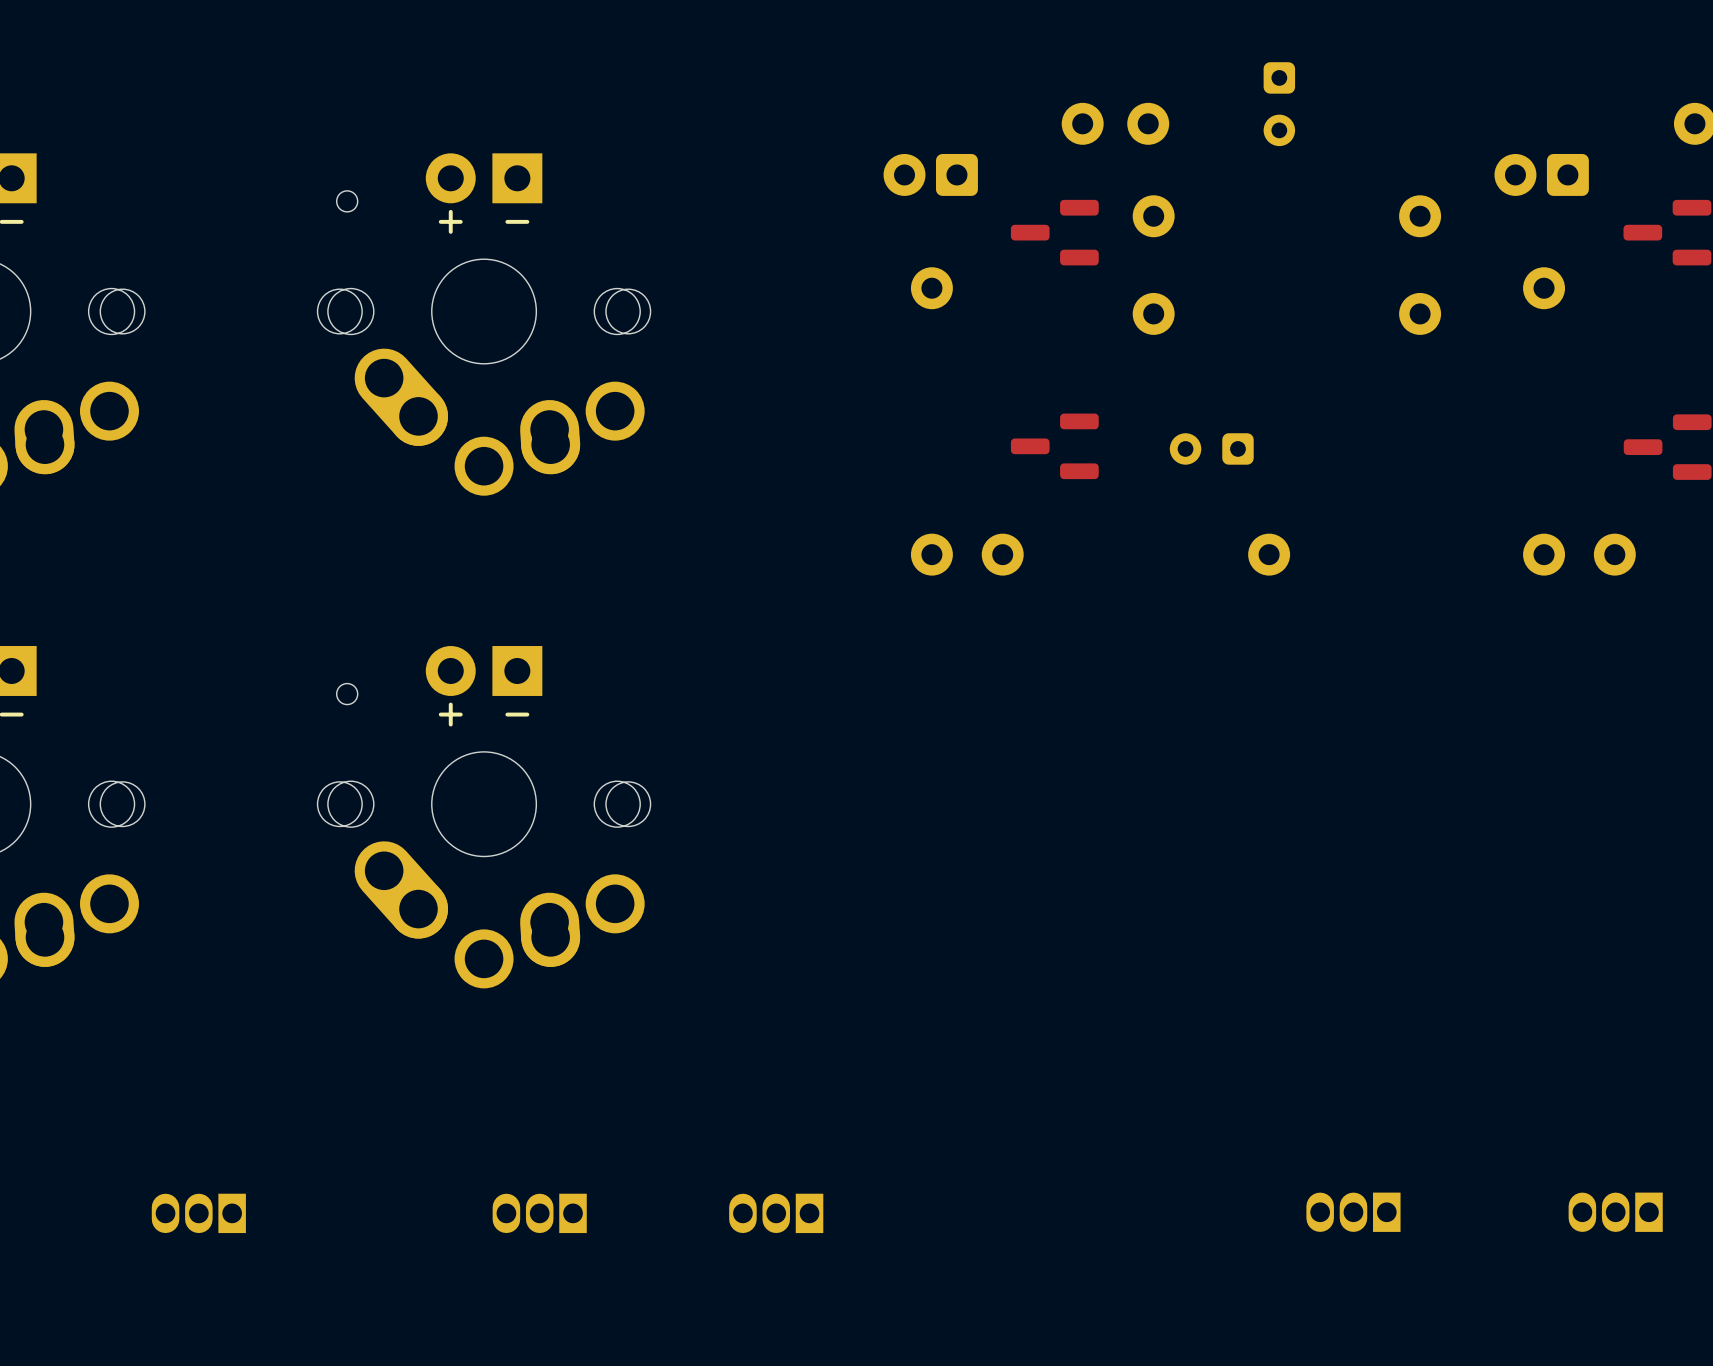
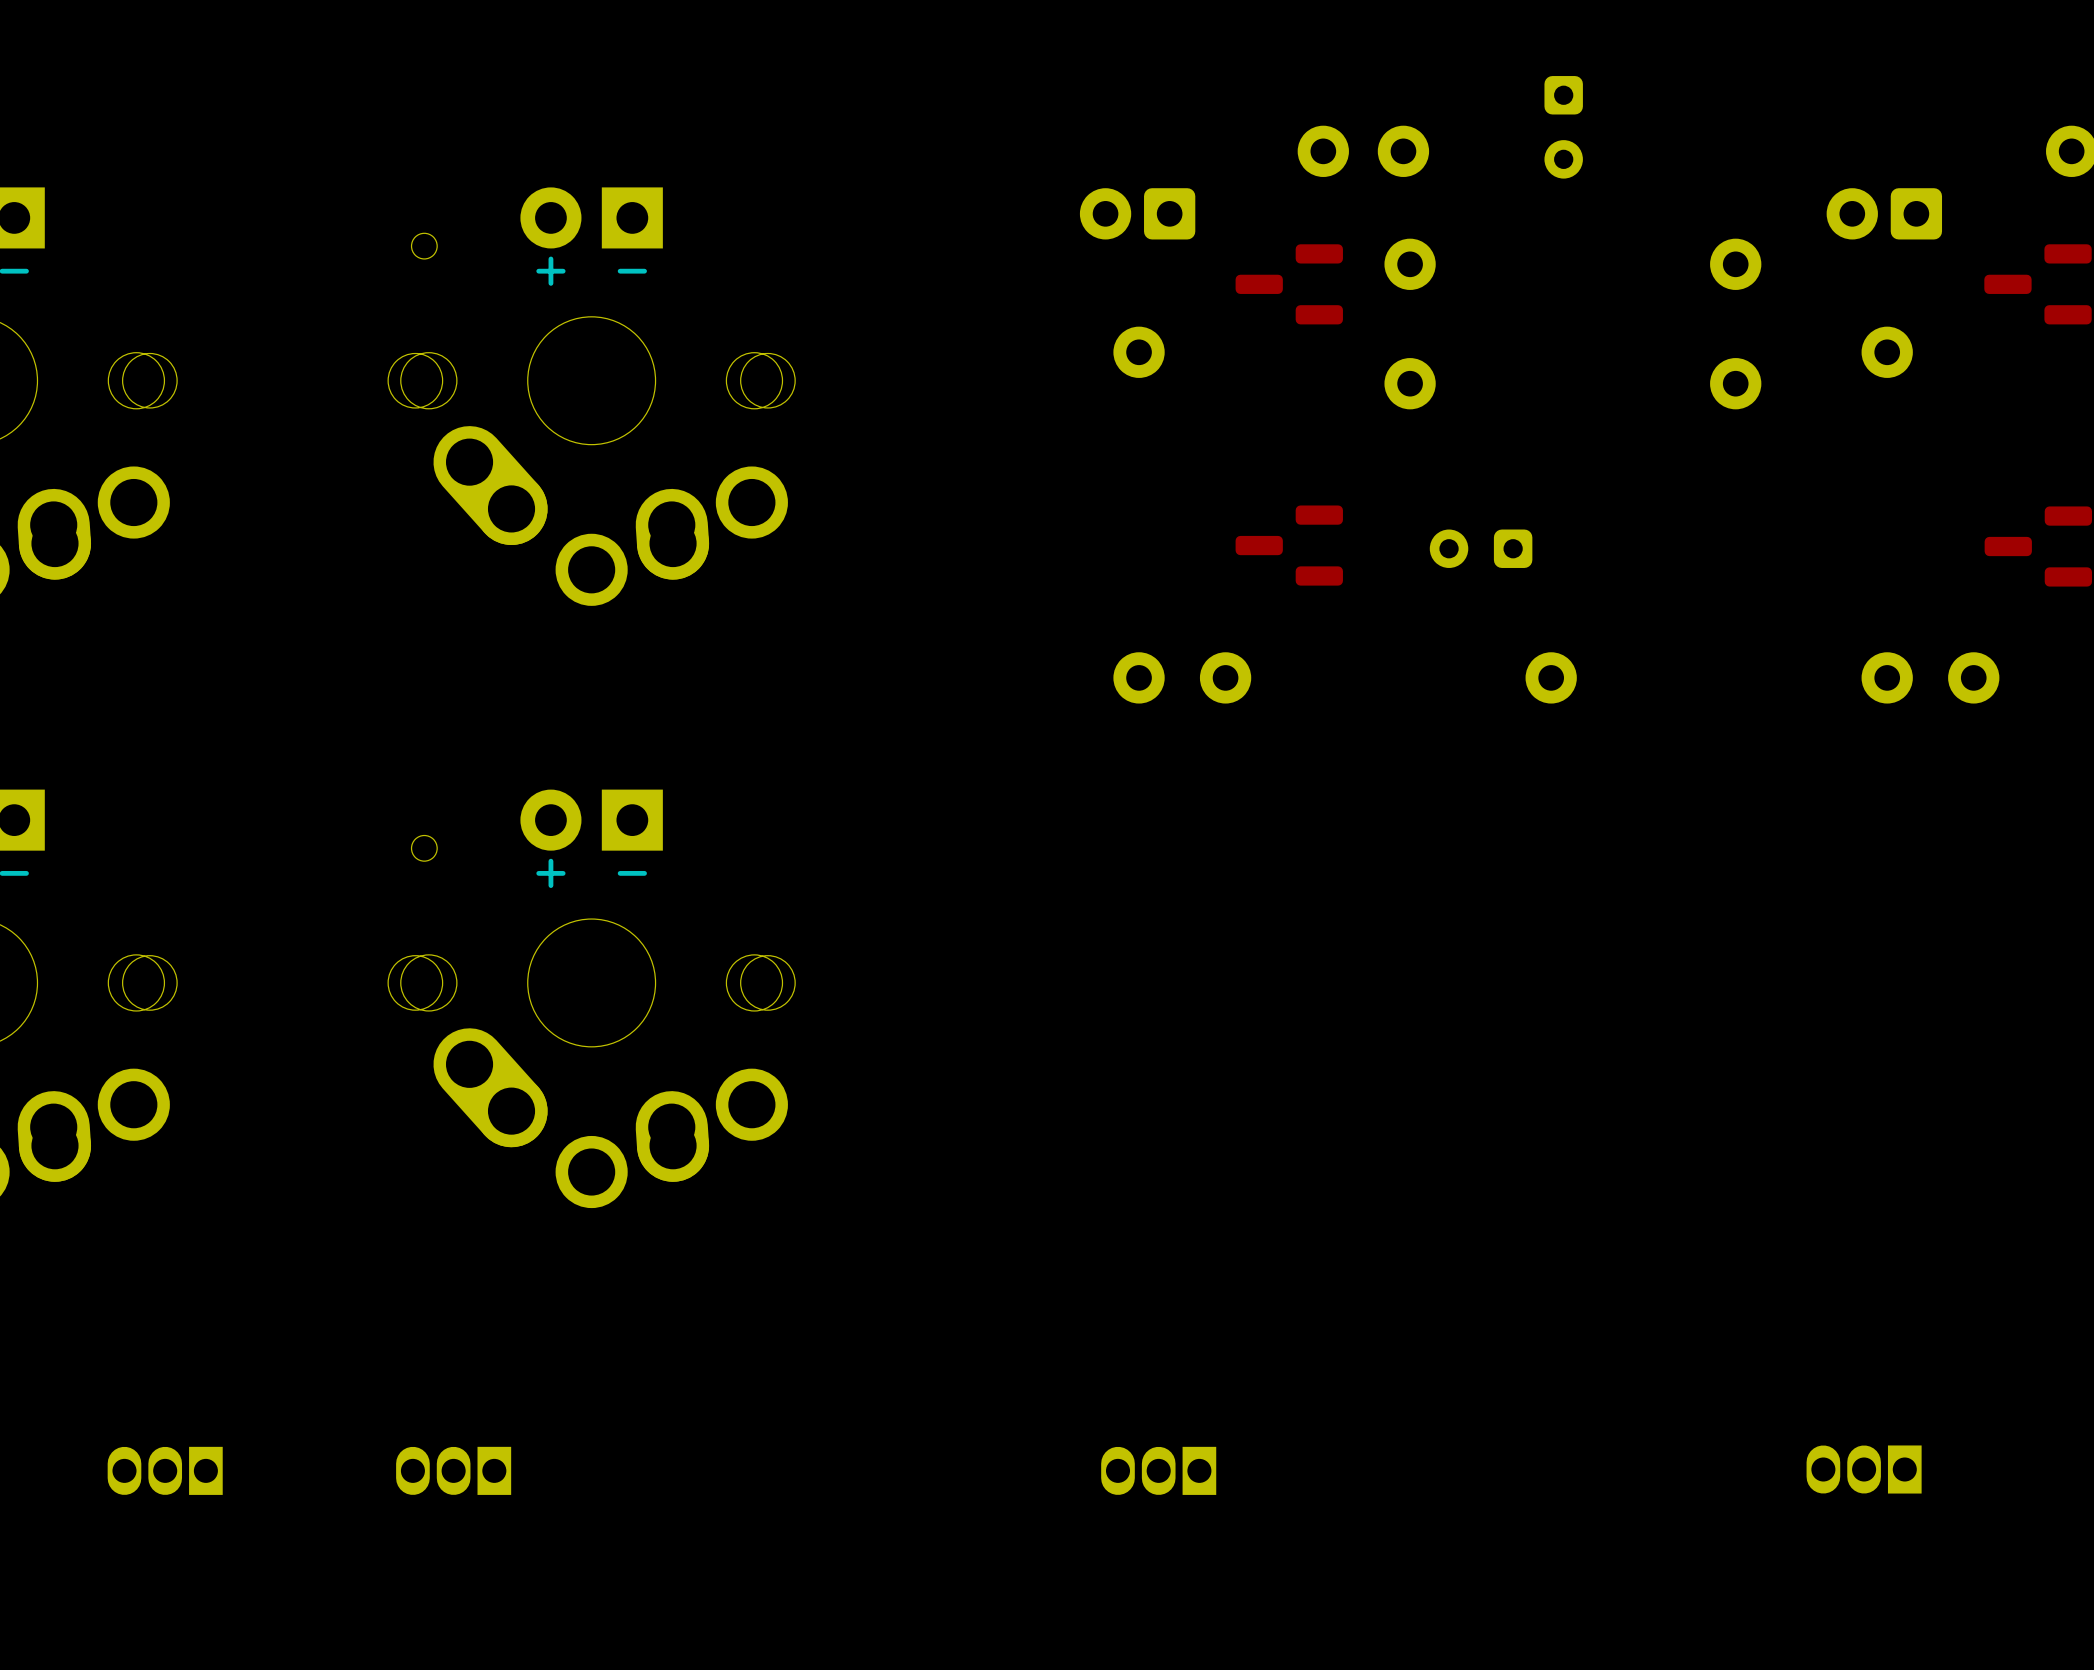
part: none -> (1864, 1469)
part: none -> (453, 1470)
part: (1353, 1212) -> none
part: (1615, 1212) -> none
part position: (198, 1213) -> (165, 1470)
part: (539, 1213) -> none
part position: (776, 1213) -> (1158, 1470)

